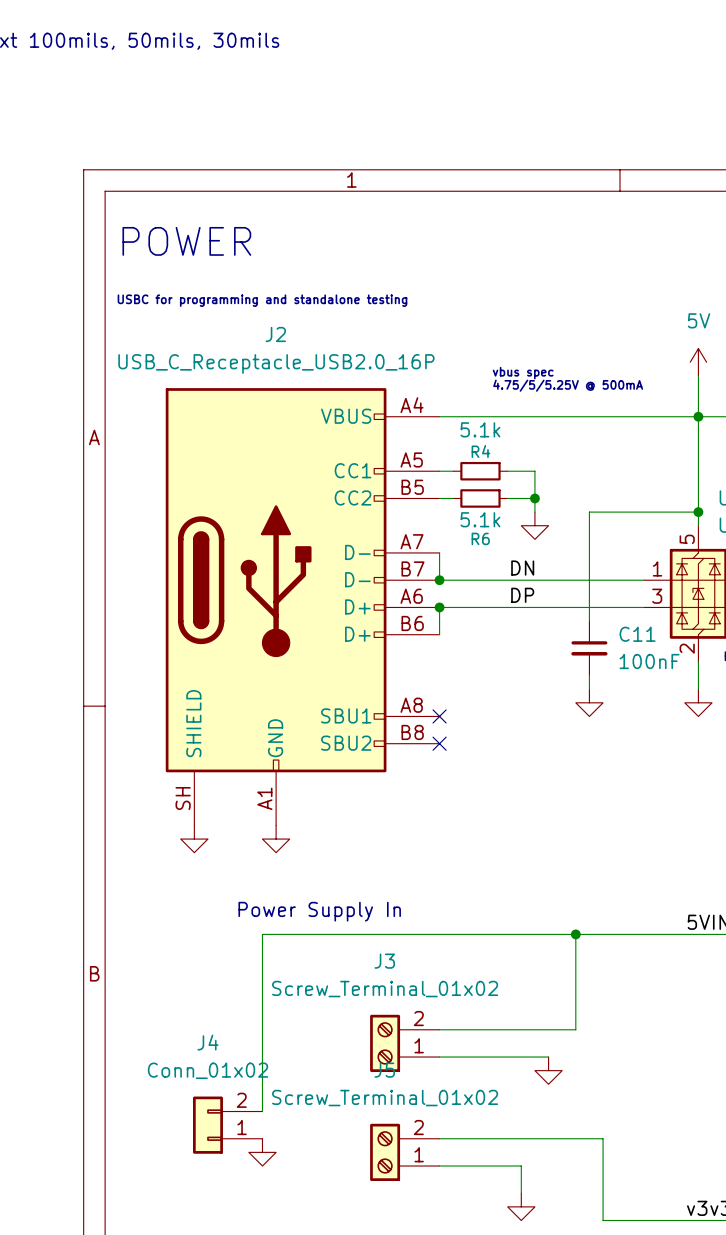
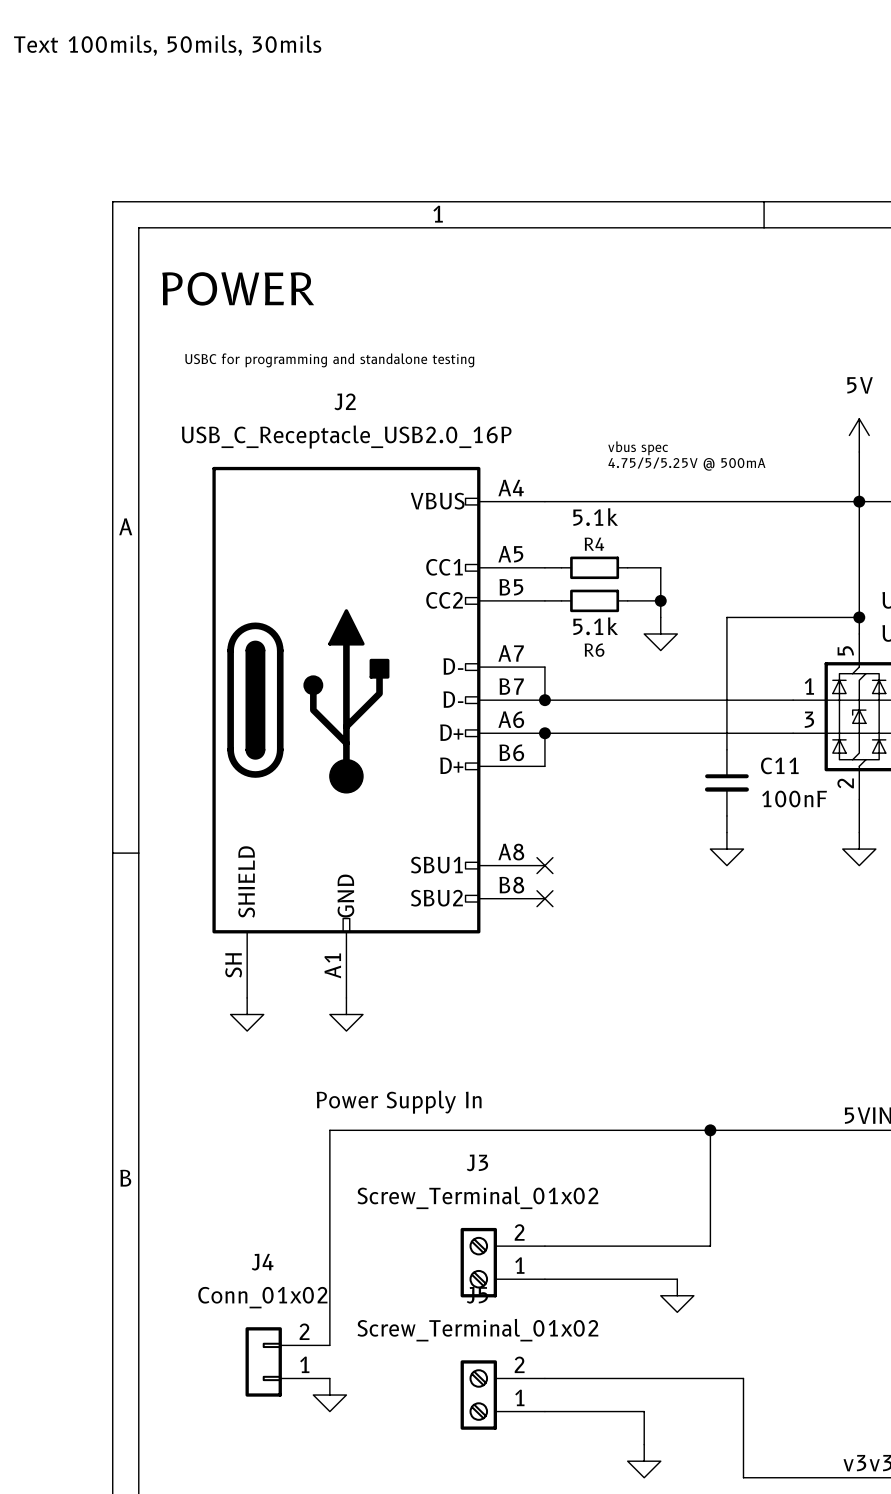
label: DN (522, 568) -> none
label: DP (522, 595) -> none

